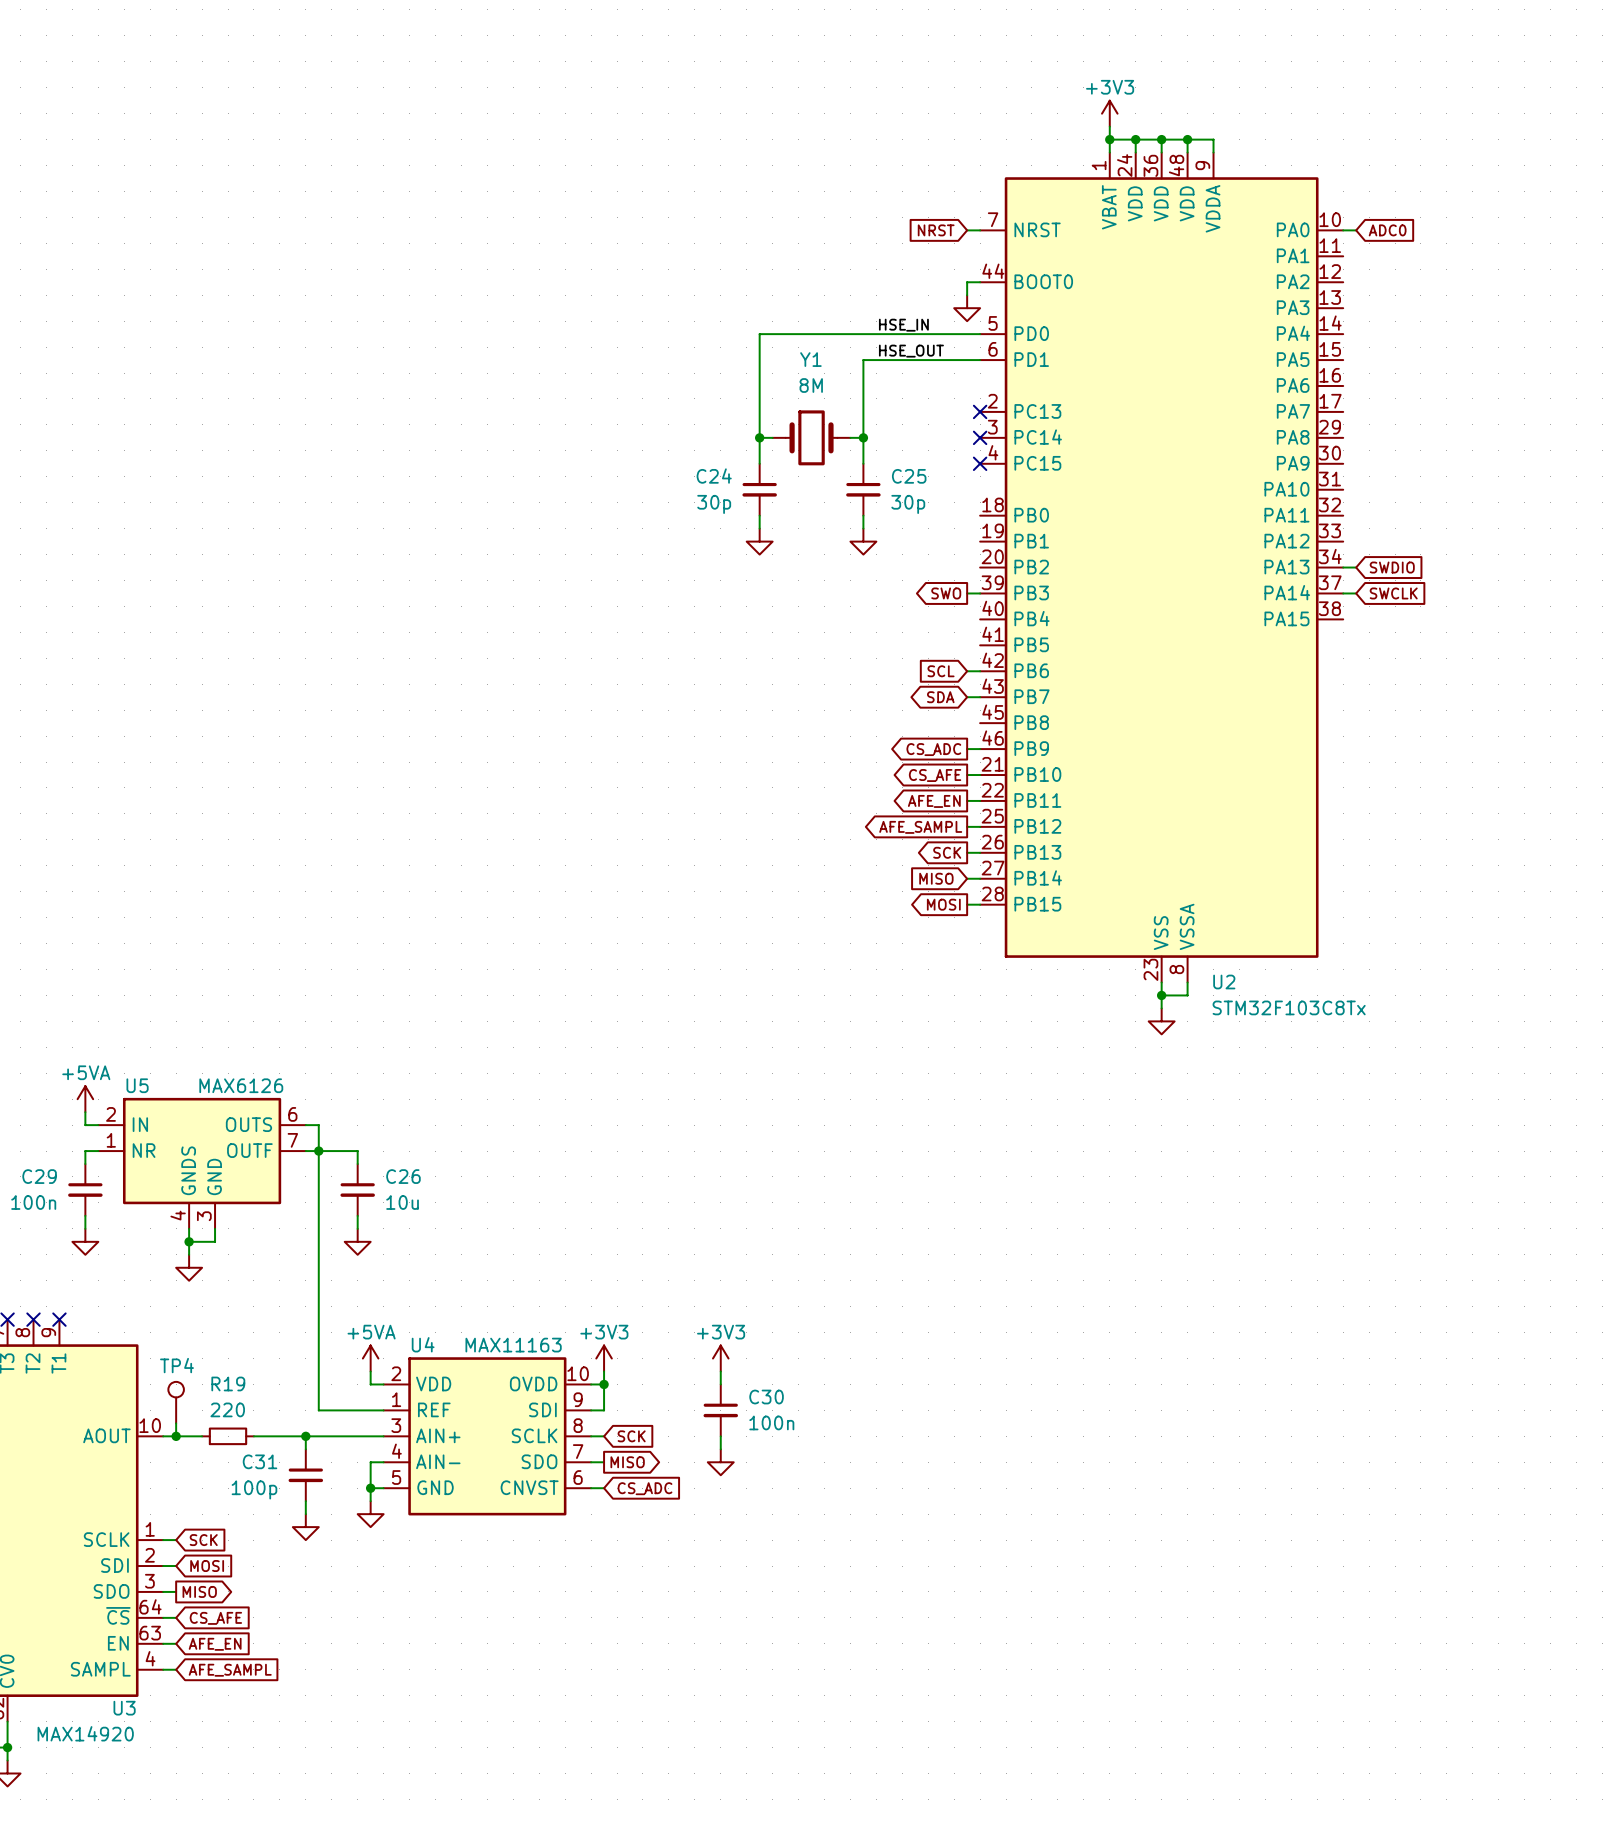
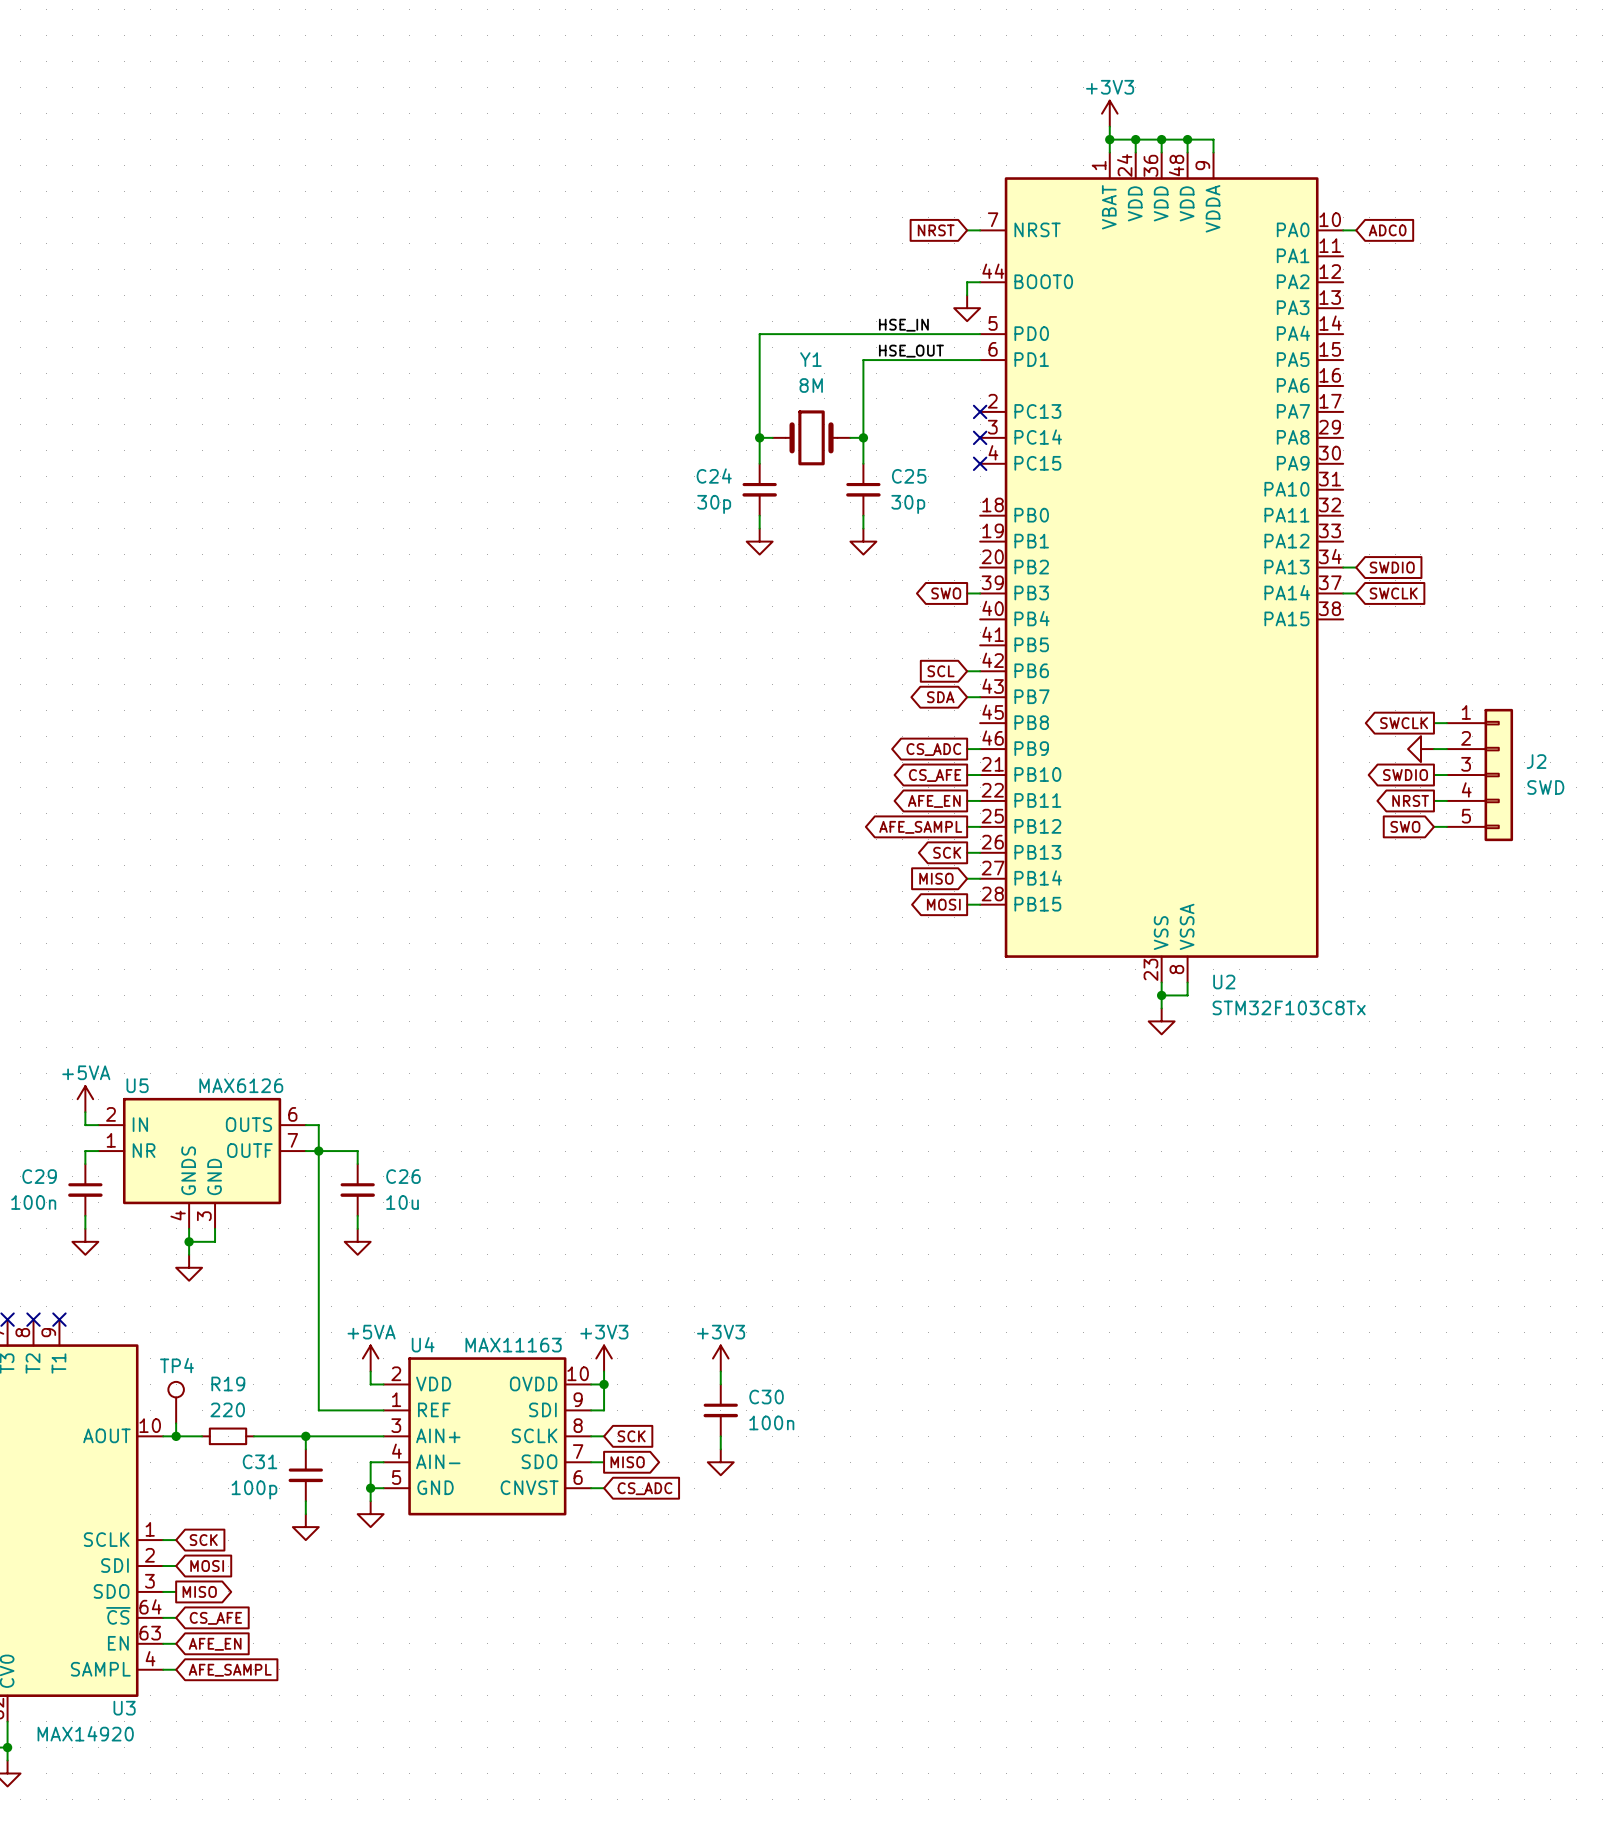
global label: none -> SWCLK (1404, 723)
wire: none -> (1433, 723) (1446, 723)
power symbol: none -> (1420, 749)
wire: none -> (1433, 749) (1446, 749)
global label: none -> SWDIO (1405, 775)
wire: none -> (1433, 775) (1446, 775)
J2: none -> SWD (1479, 775)
global label: none -> NRST (1410, 800)
wire: none -> (1433, 800) (1446, 800)
global label: none -> SWO (1405, 826)
wire: none -> (1433, 826) (1446, 826)

